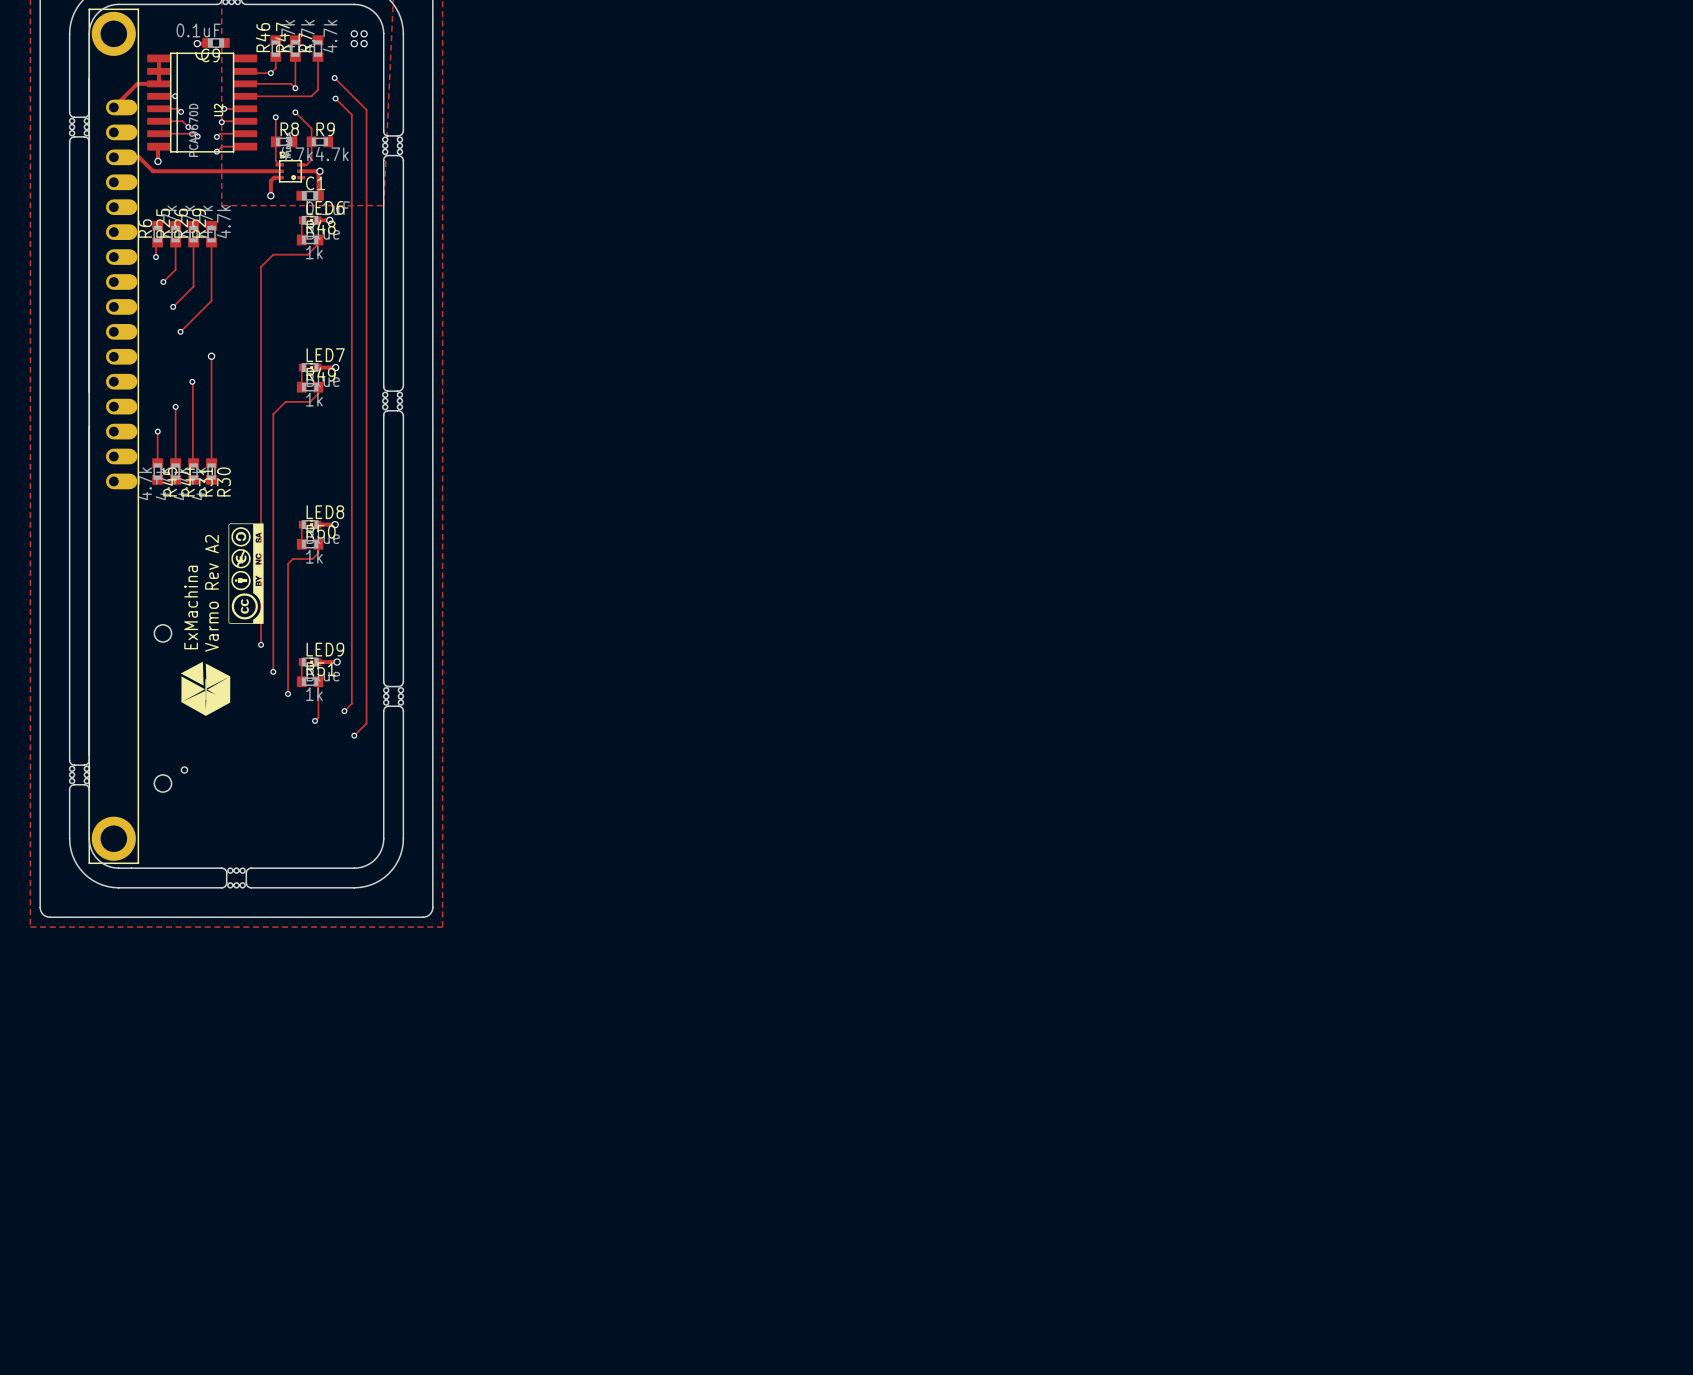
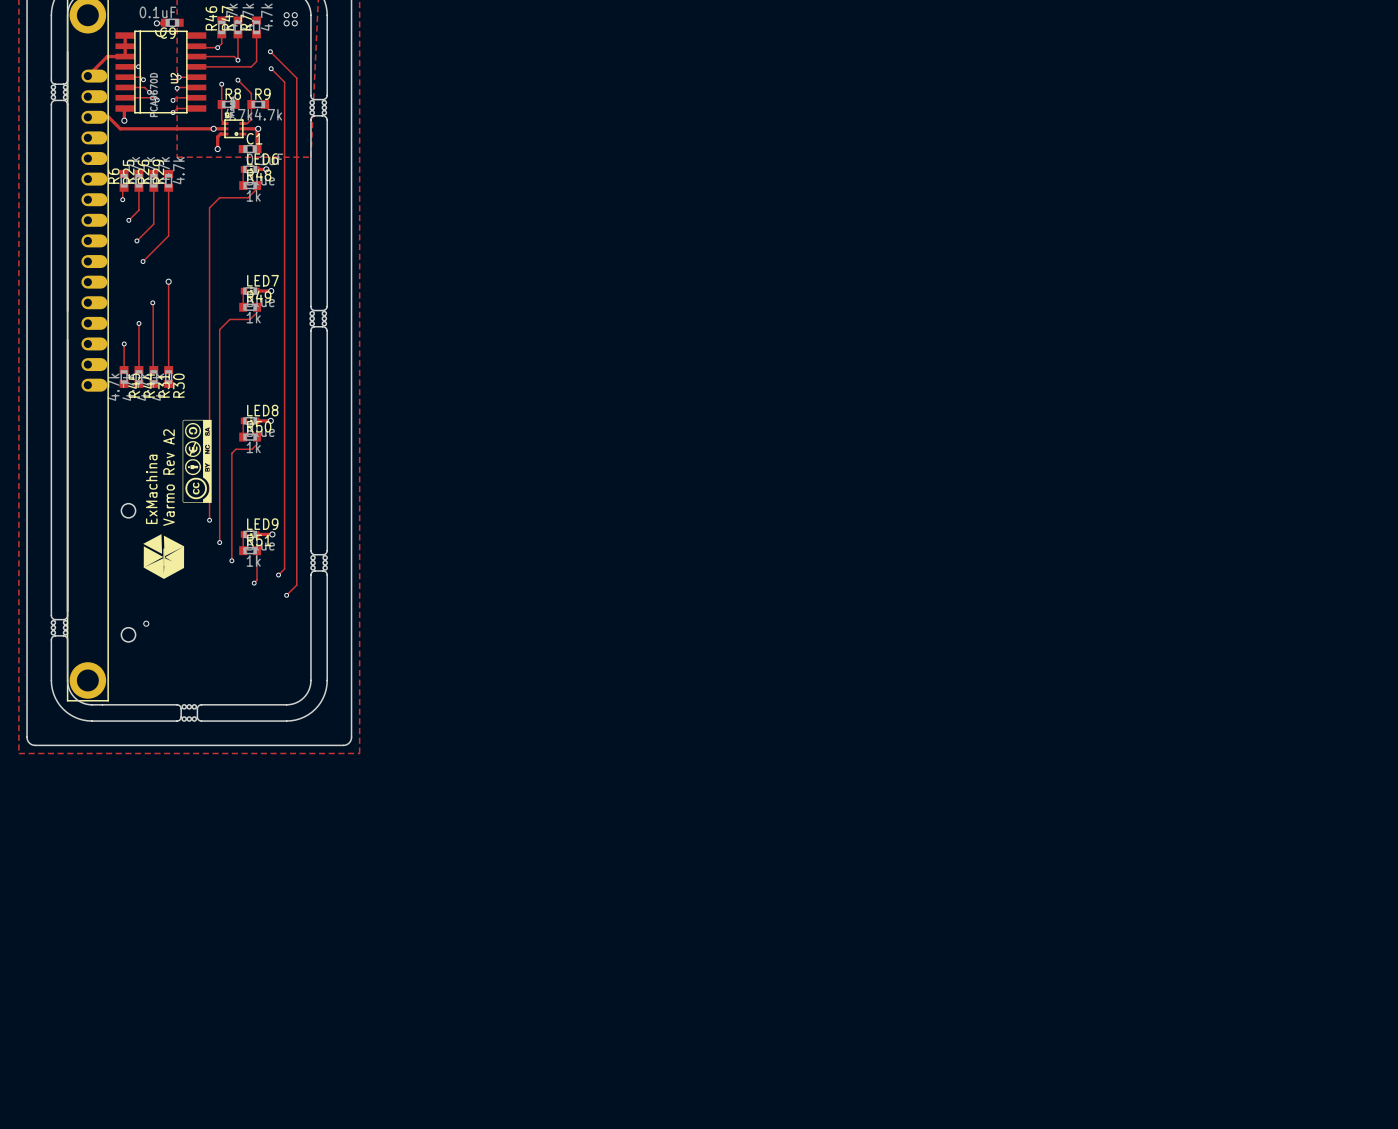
via: none -> (213, 128)

